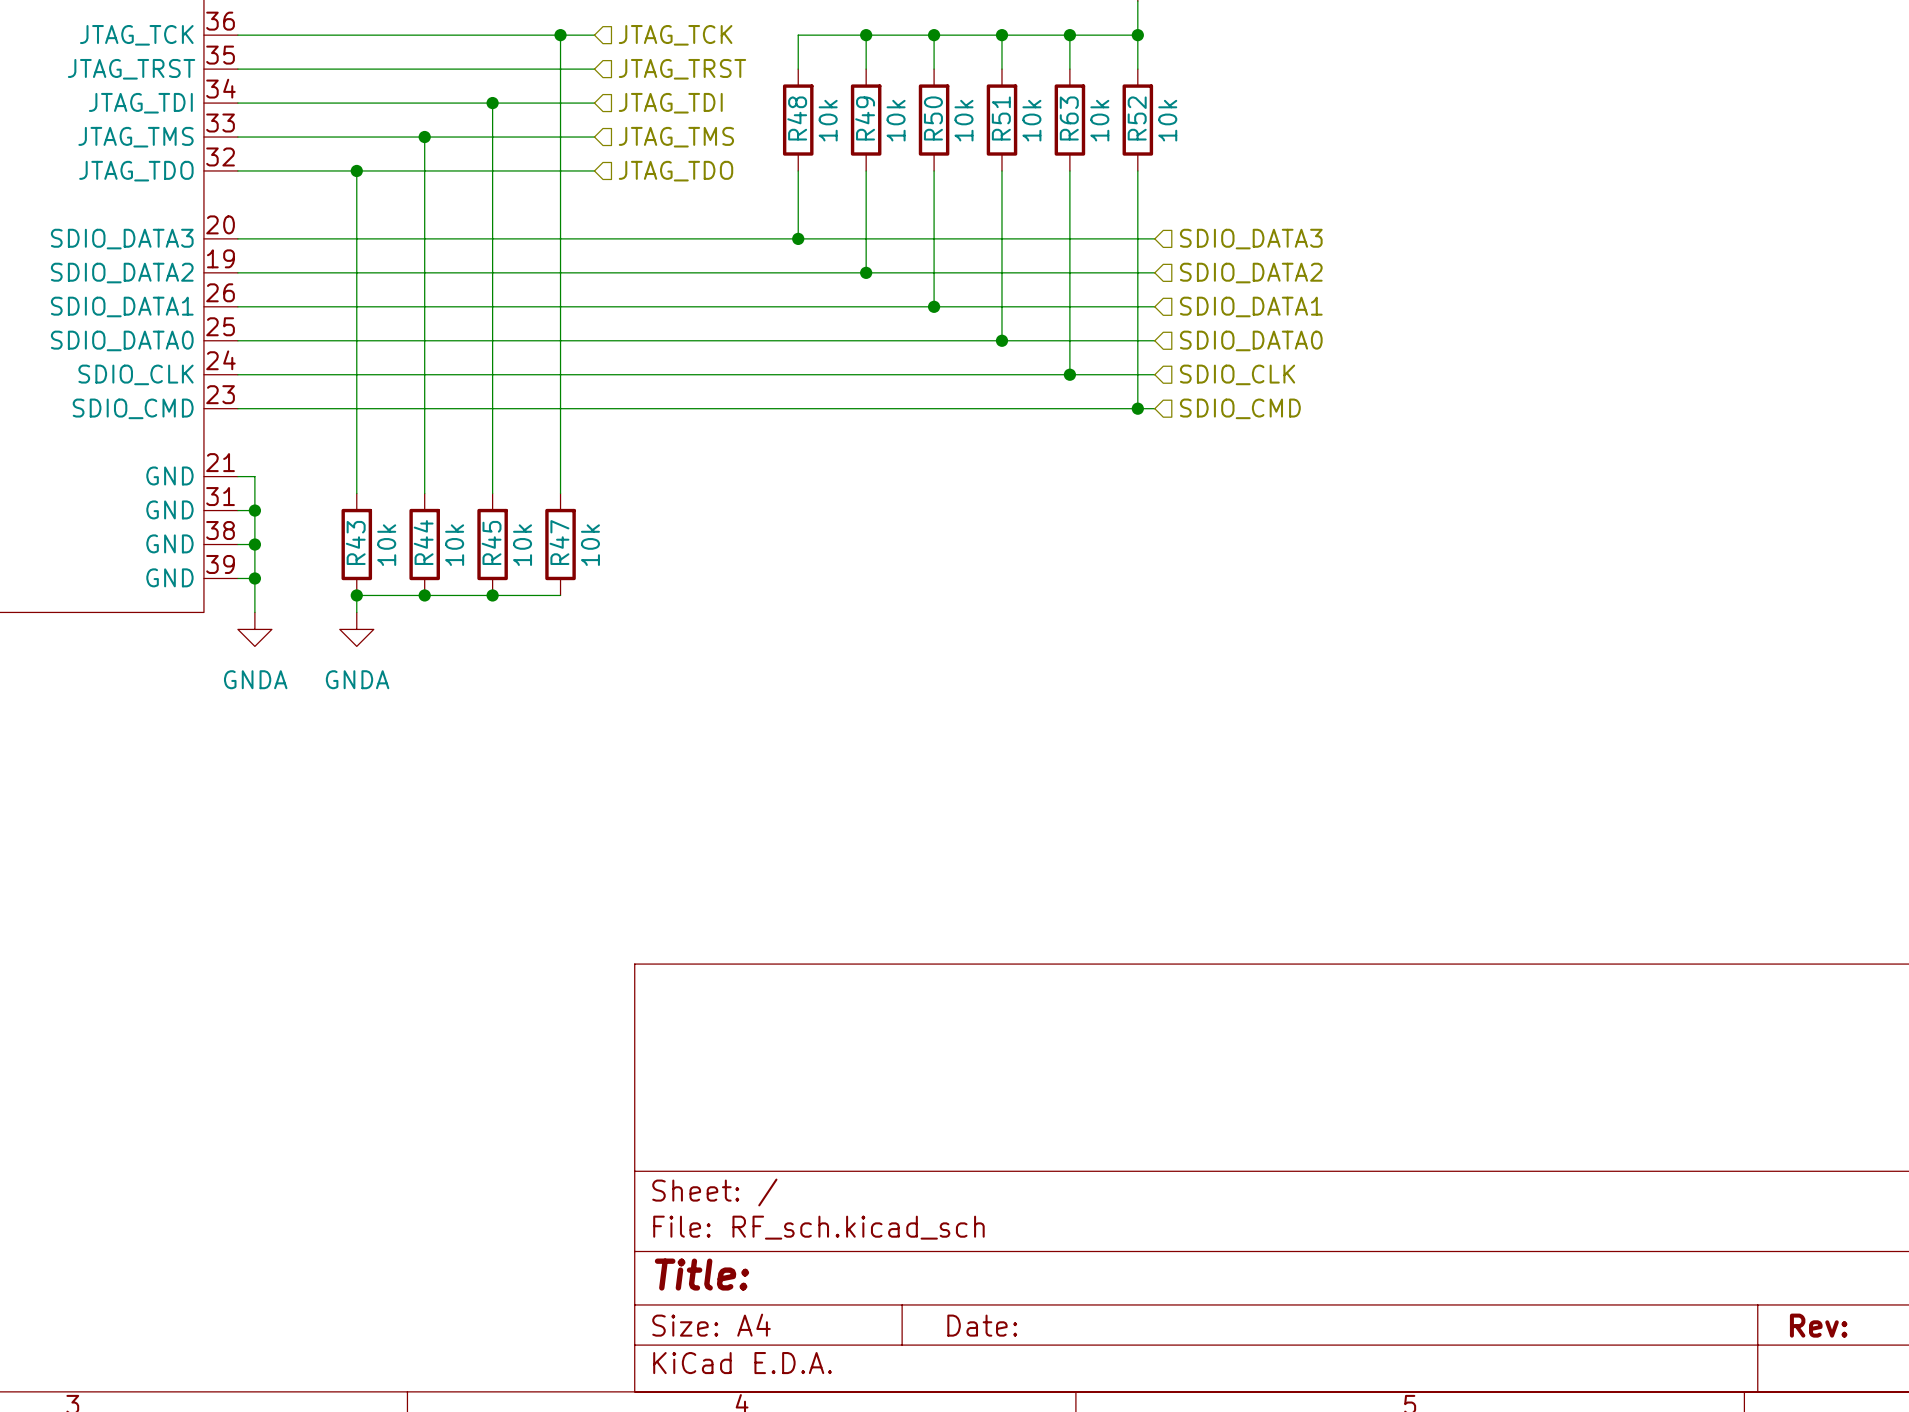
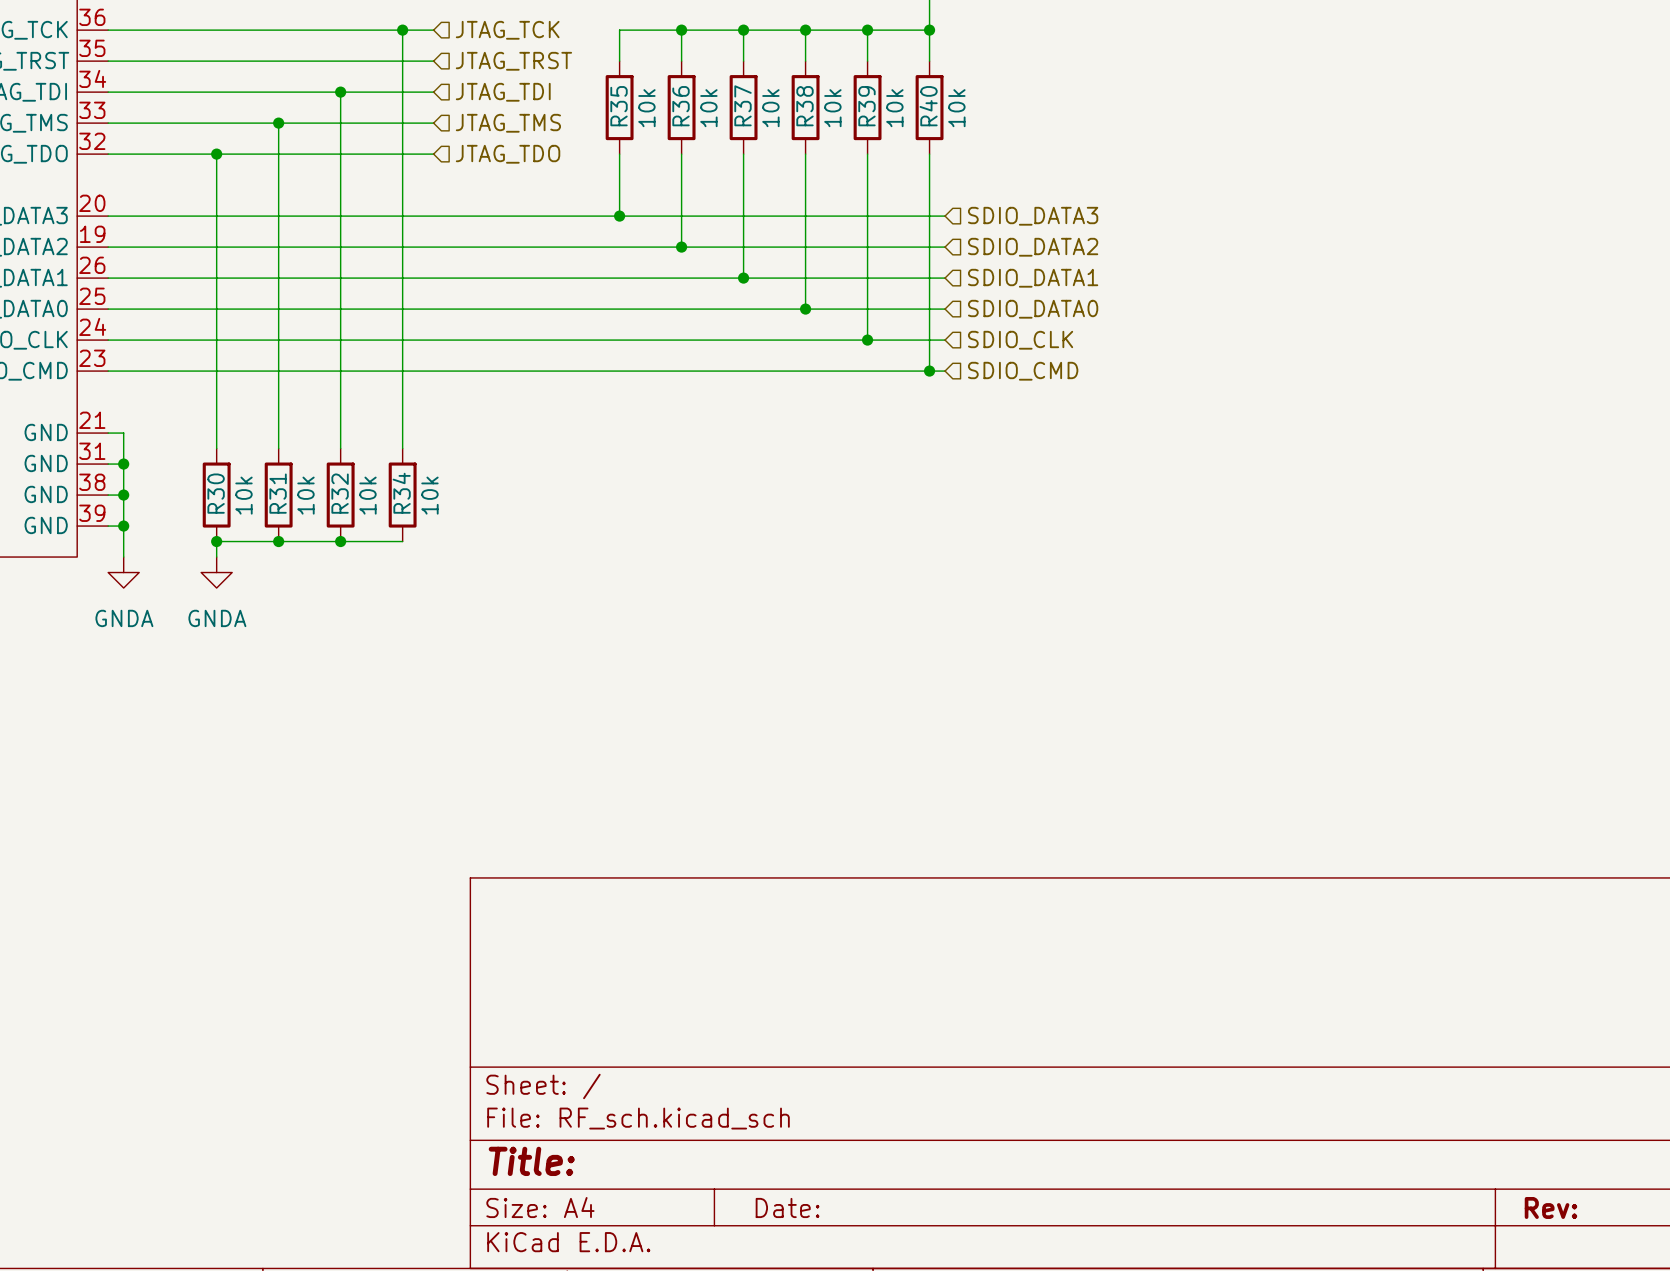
R48 name: R48 (797, 118) -> R35 (619, 106)
R49 name: R49 (865, 118) -> R36 (681, 106)
R50 name: R50 (933, 118) -> R37 (743, 105)
R51 name: R51 (1001, 118) -> R38 (804, 106)
R63 name: R63 (1069, 118) -> R39 (866, 106)
R52 name: R52 (1137, 118) -> R40 (928, 106)
R43 name: R43 (355, 542) -> R30 (216, 493)
R44 name: R44 (423, 542) -> R31 (278, 493)
R45 name: R45 (491, 542) -> R32 (340, 493)
R47 name: R47 (559, 542) -> R34 (401, 493)

